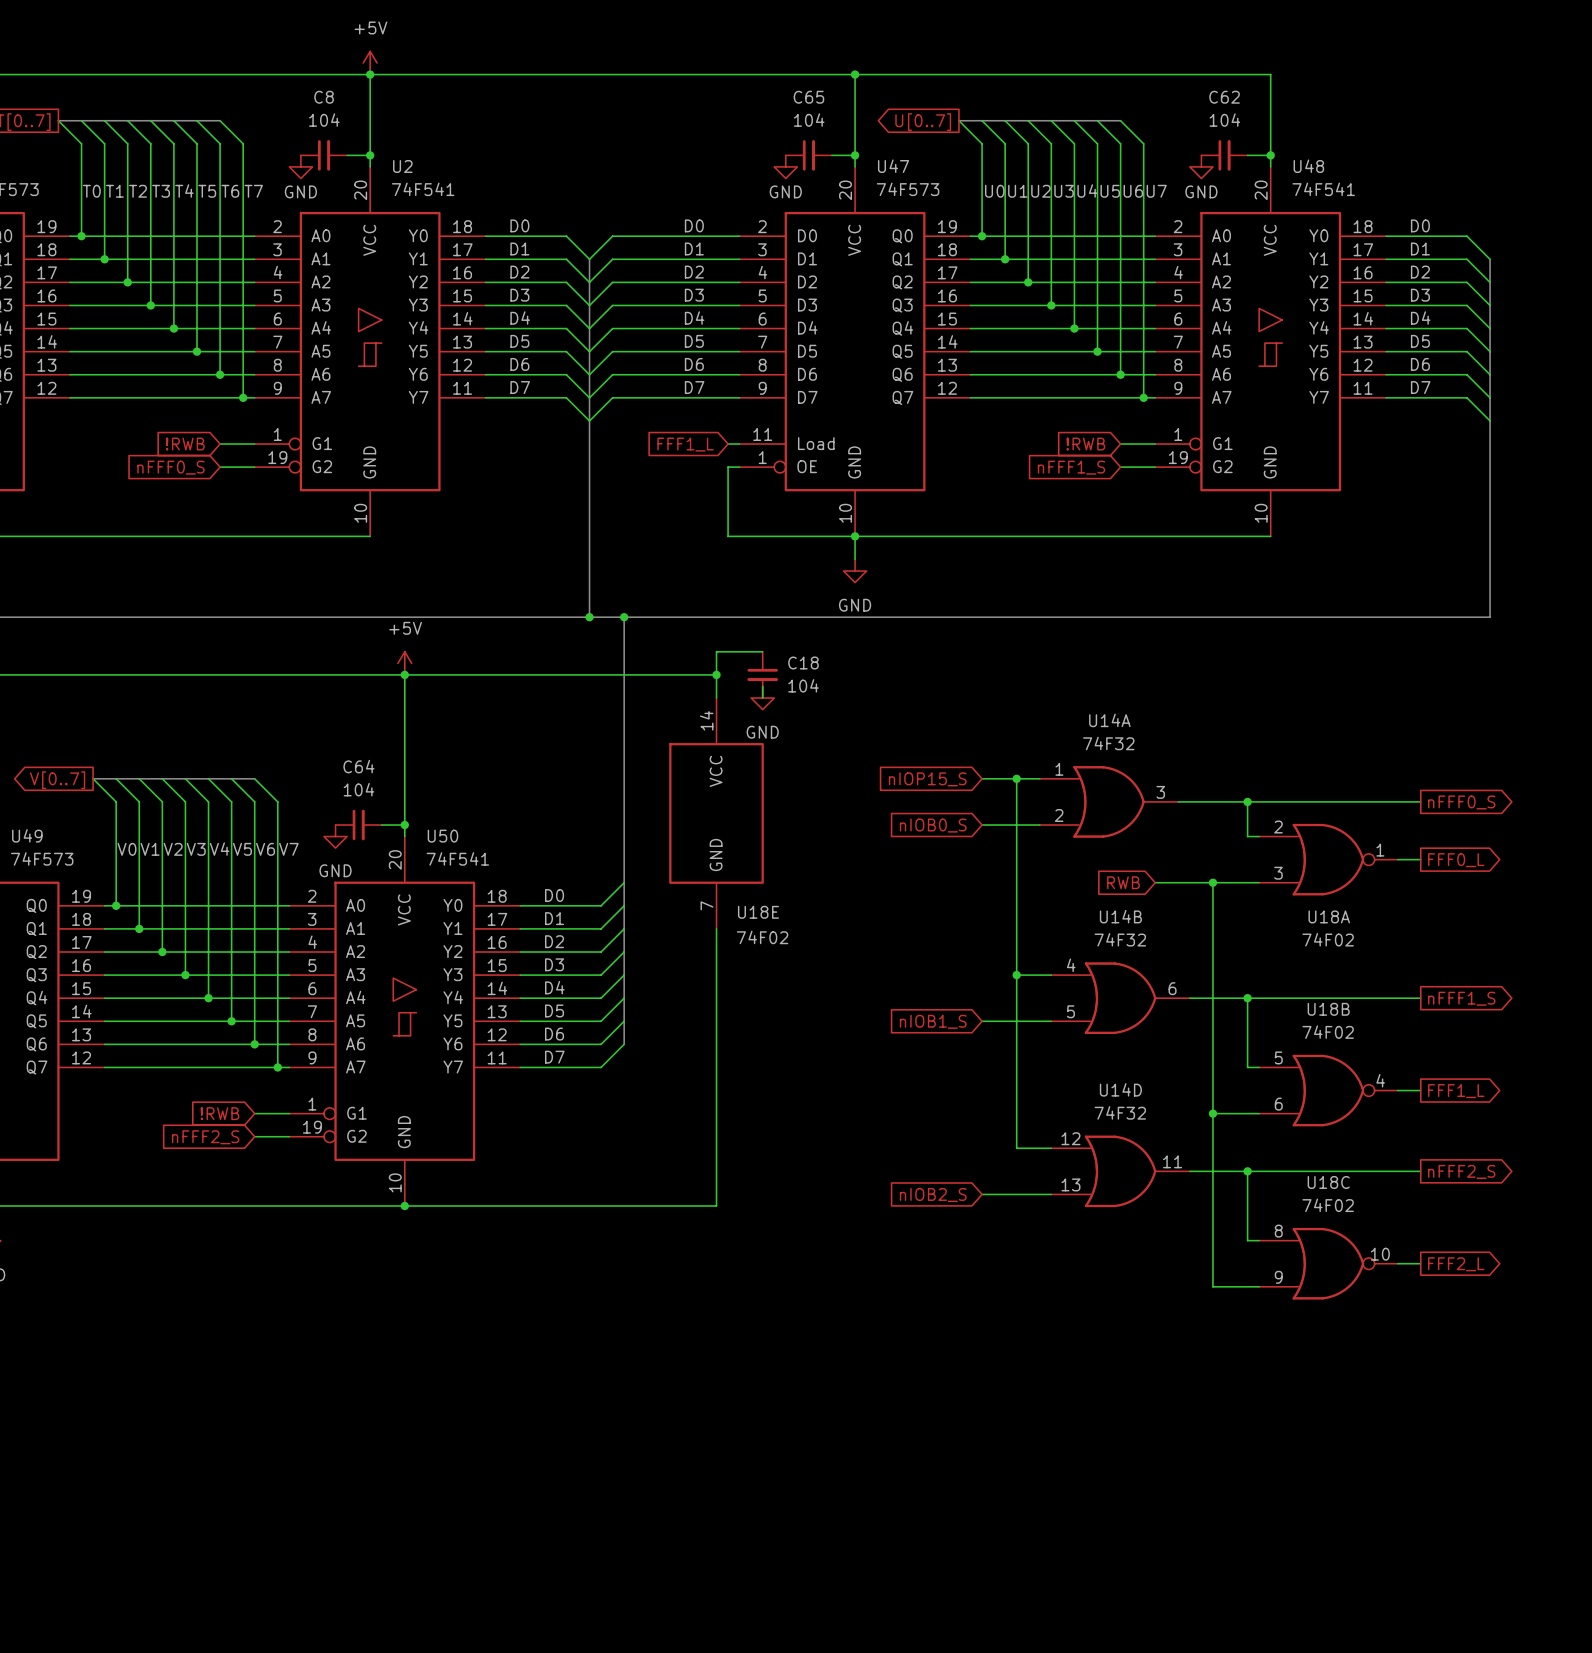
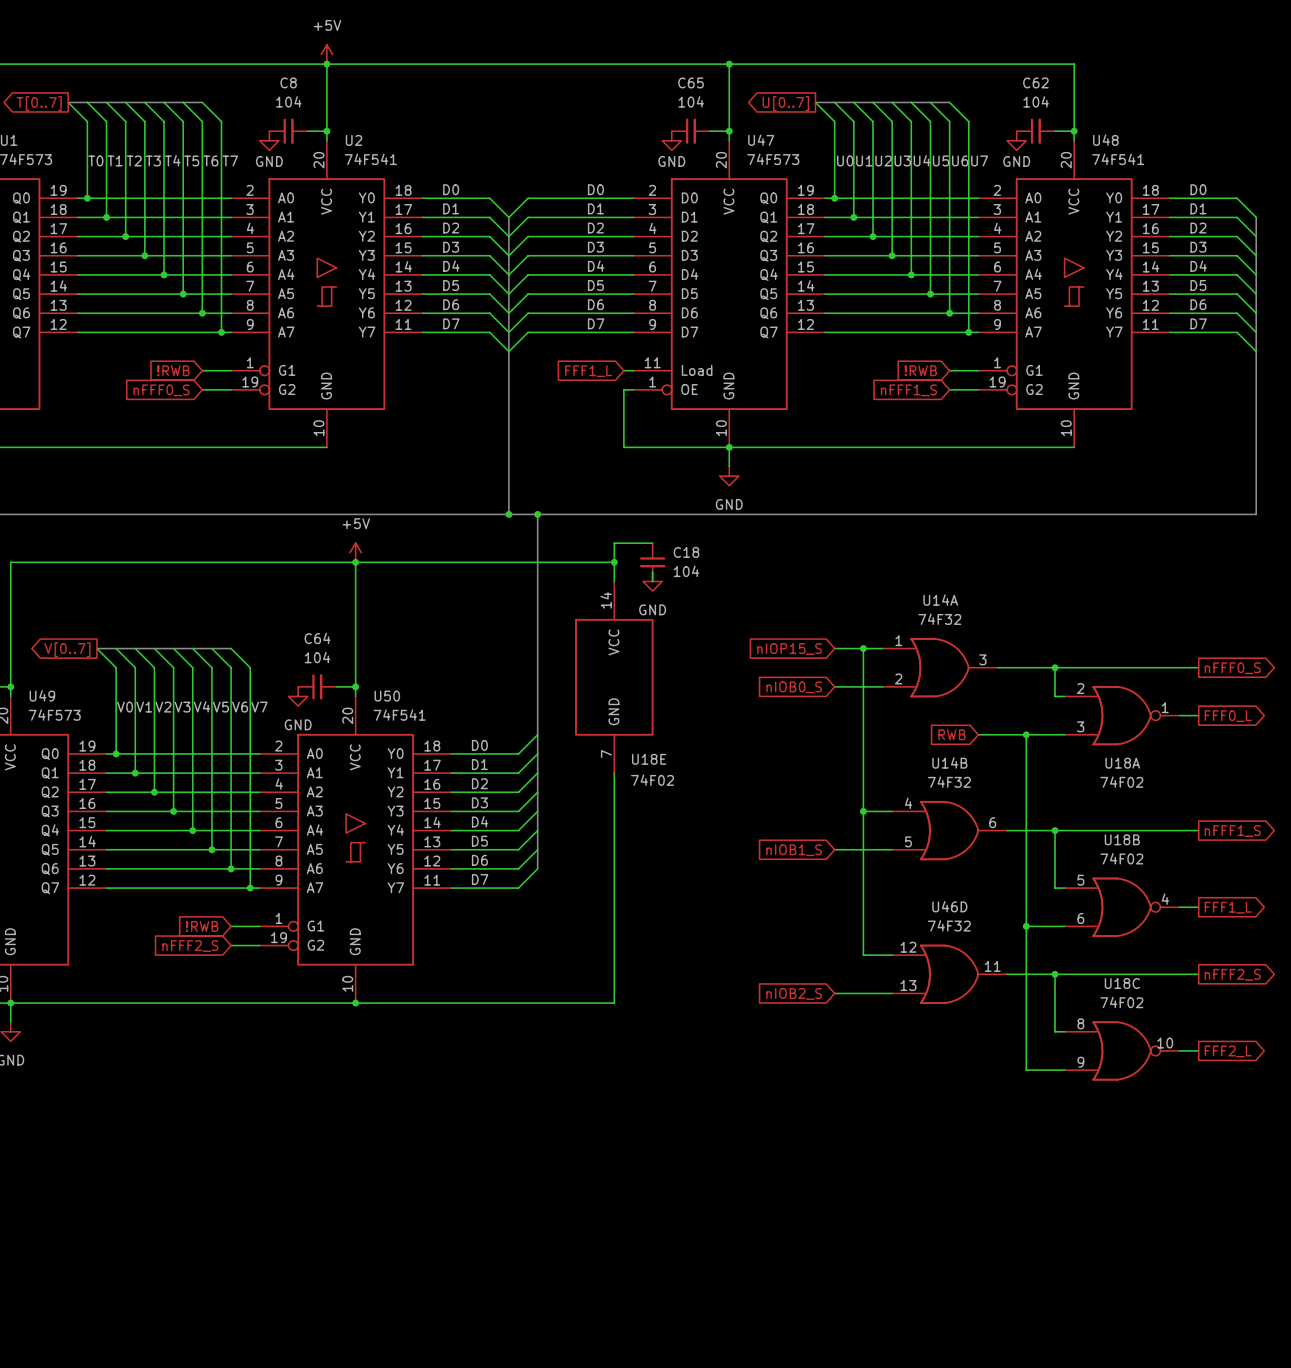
U14D name: U14D (1120, 1089) -> U46D (949, 906)

